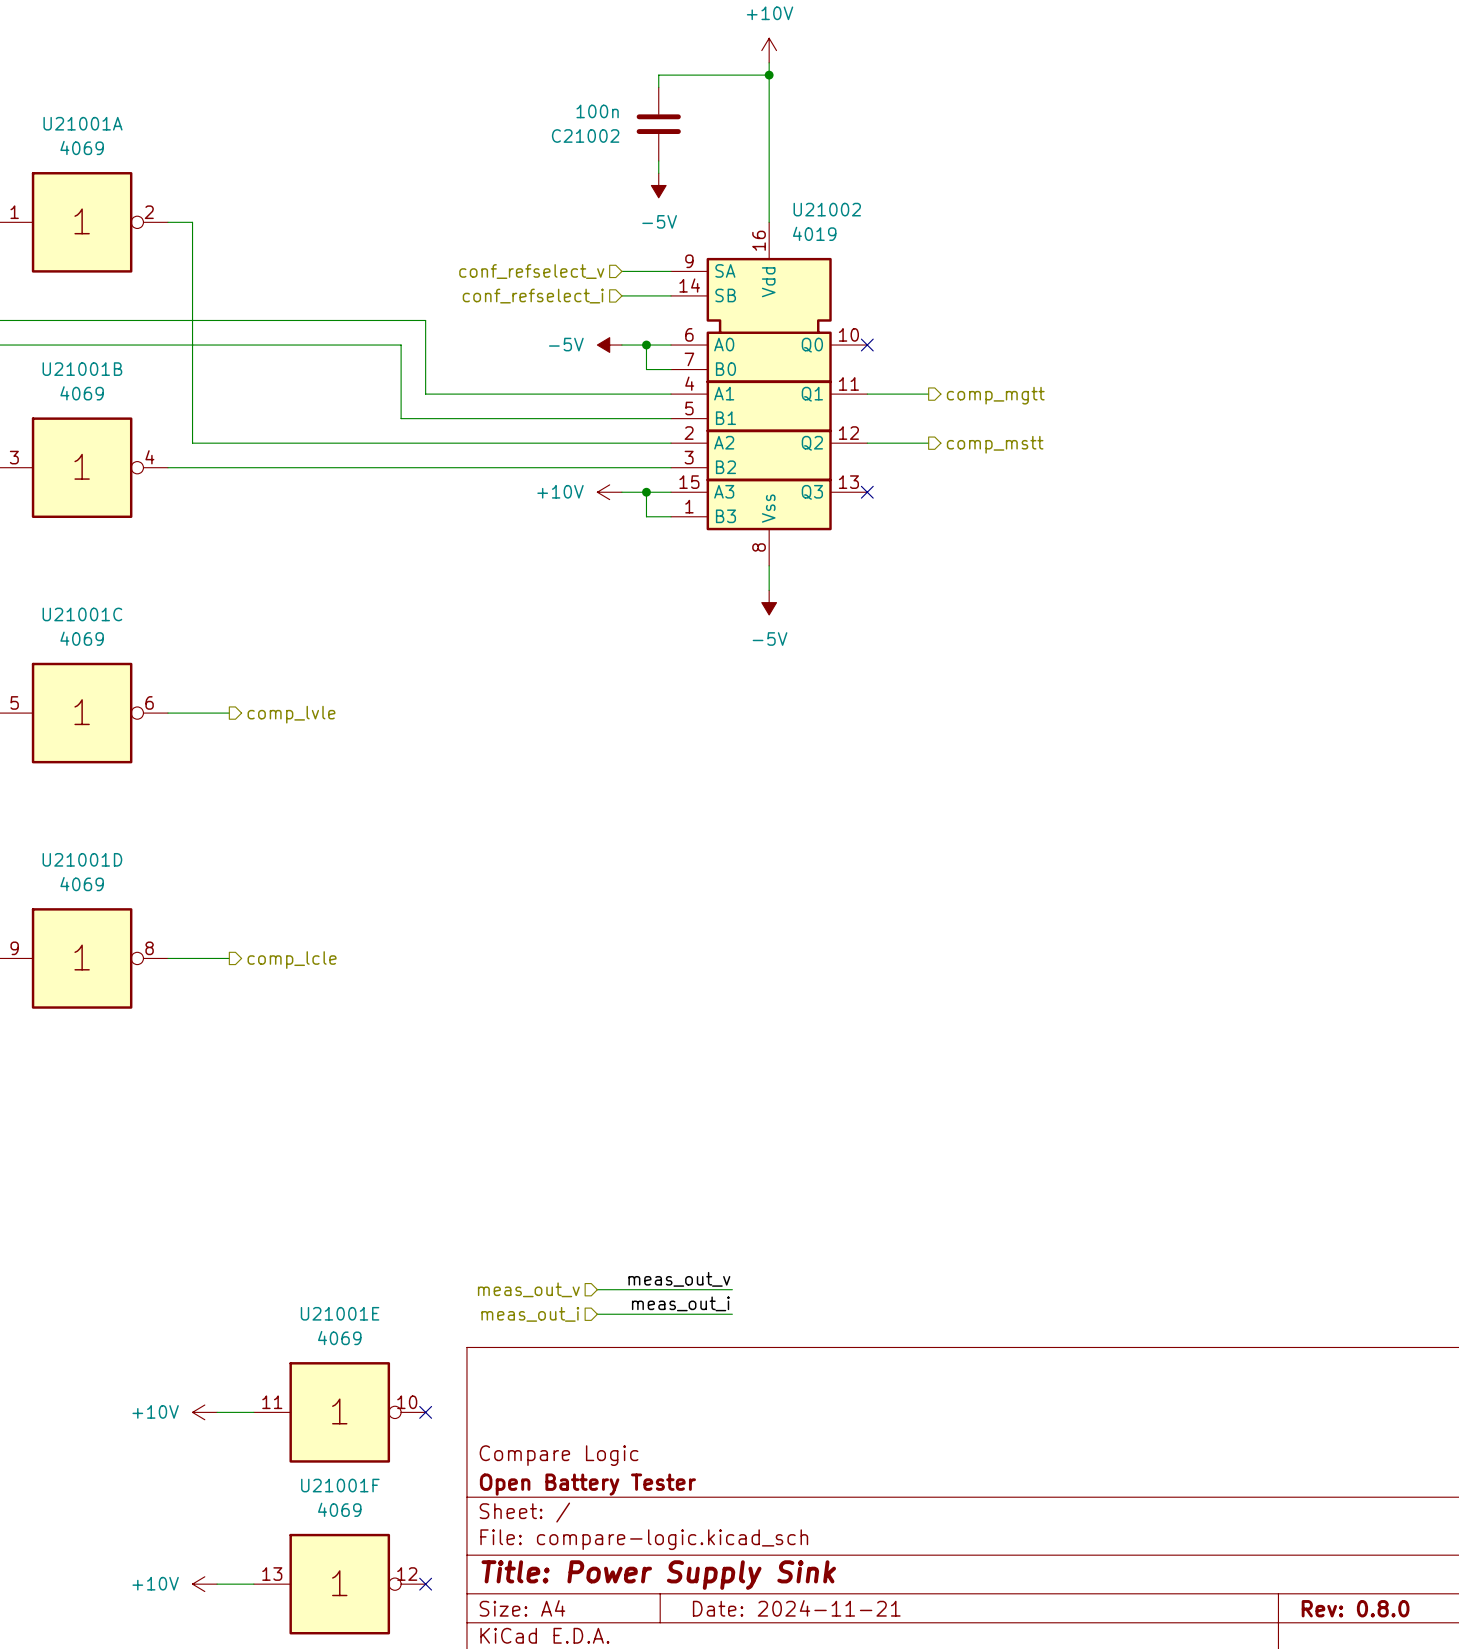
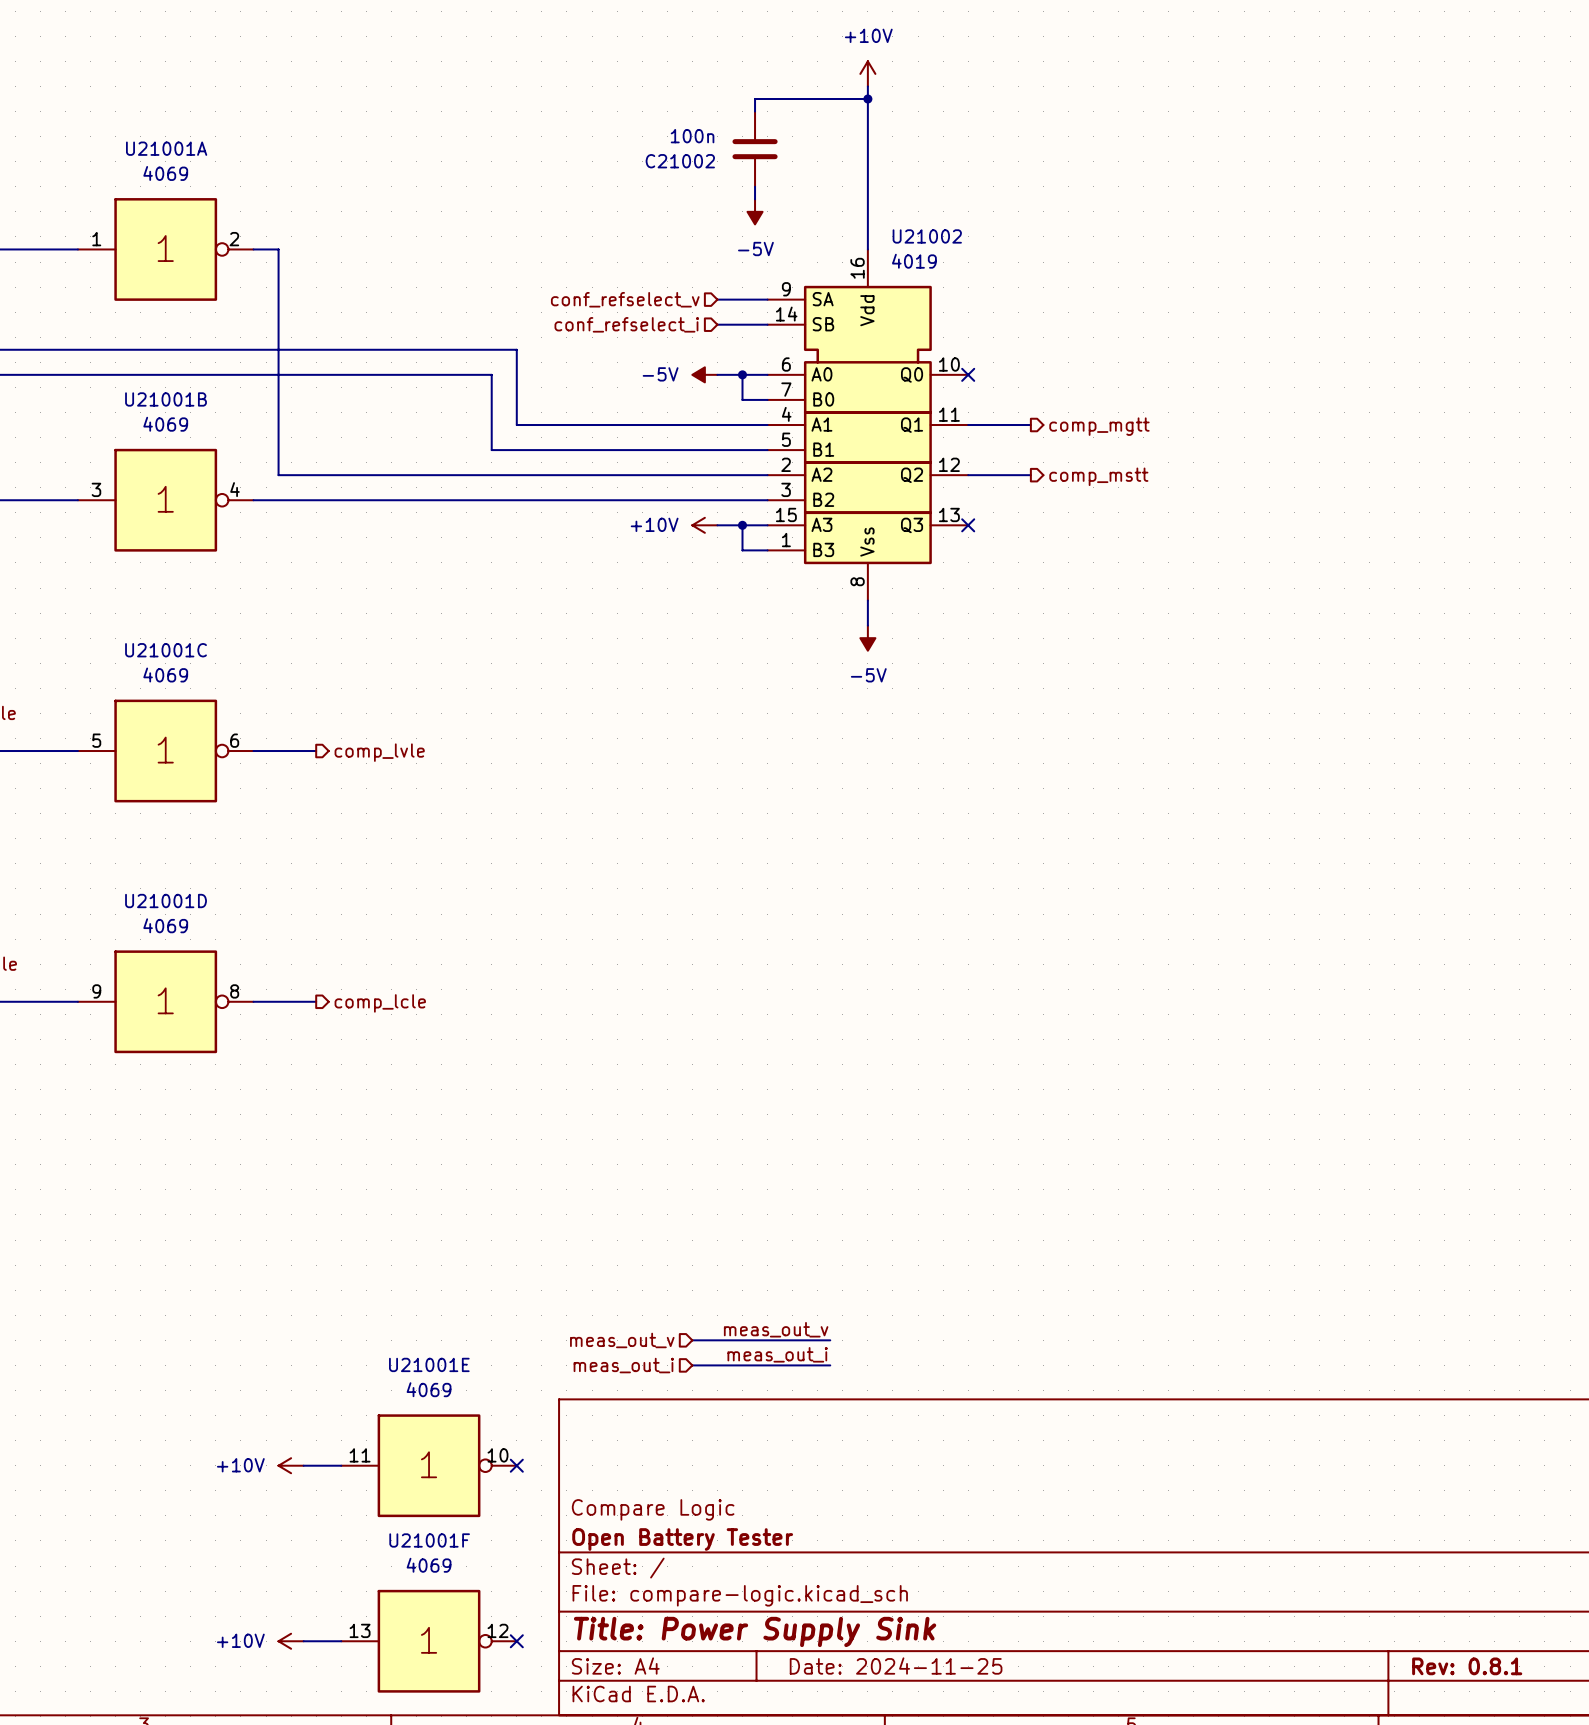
title block: Date: 2024-11-21 (796, 1608) -> Date: 2024-11-25 (896, 1666)
title block: Rev: 0.8.0 (1355, 1608) -> Rev: 0.8.1 (1467, 1666)

